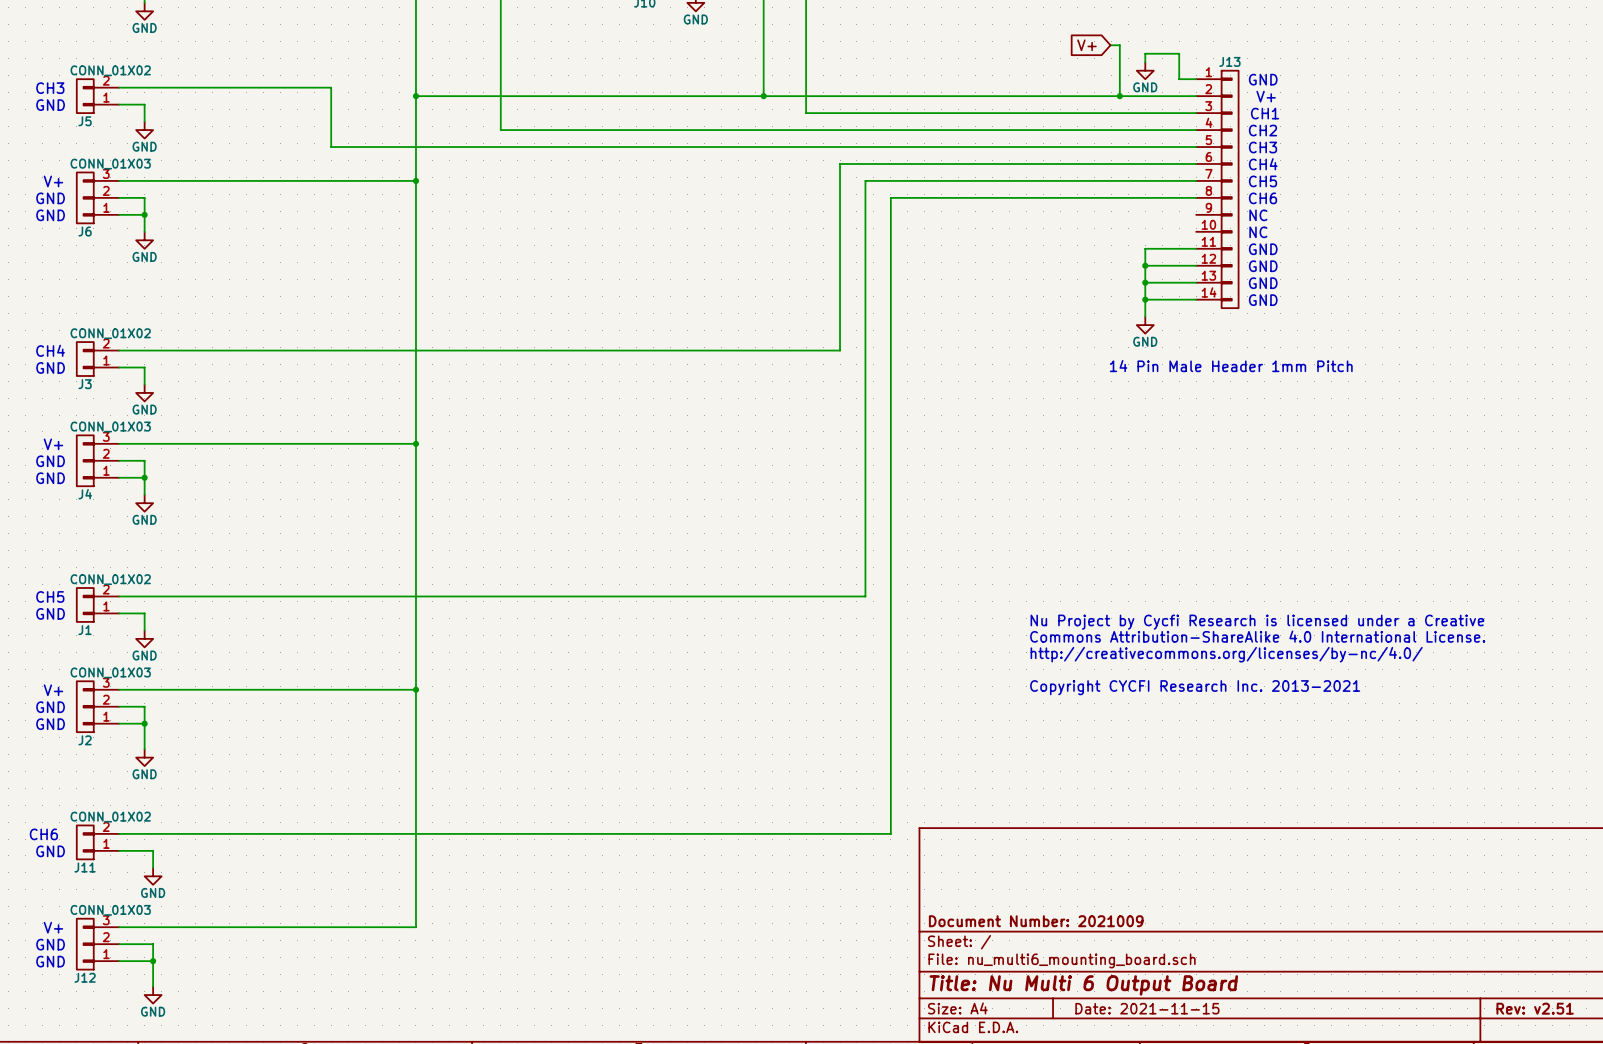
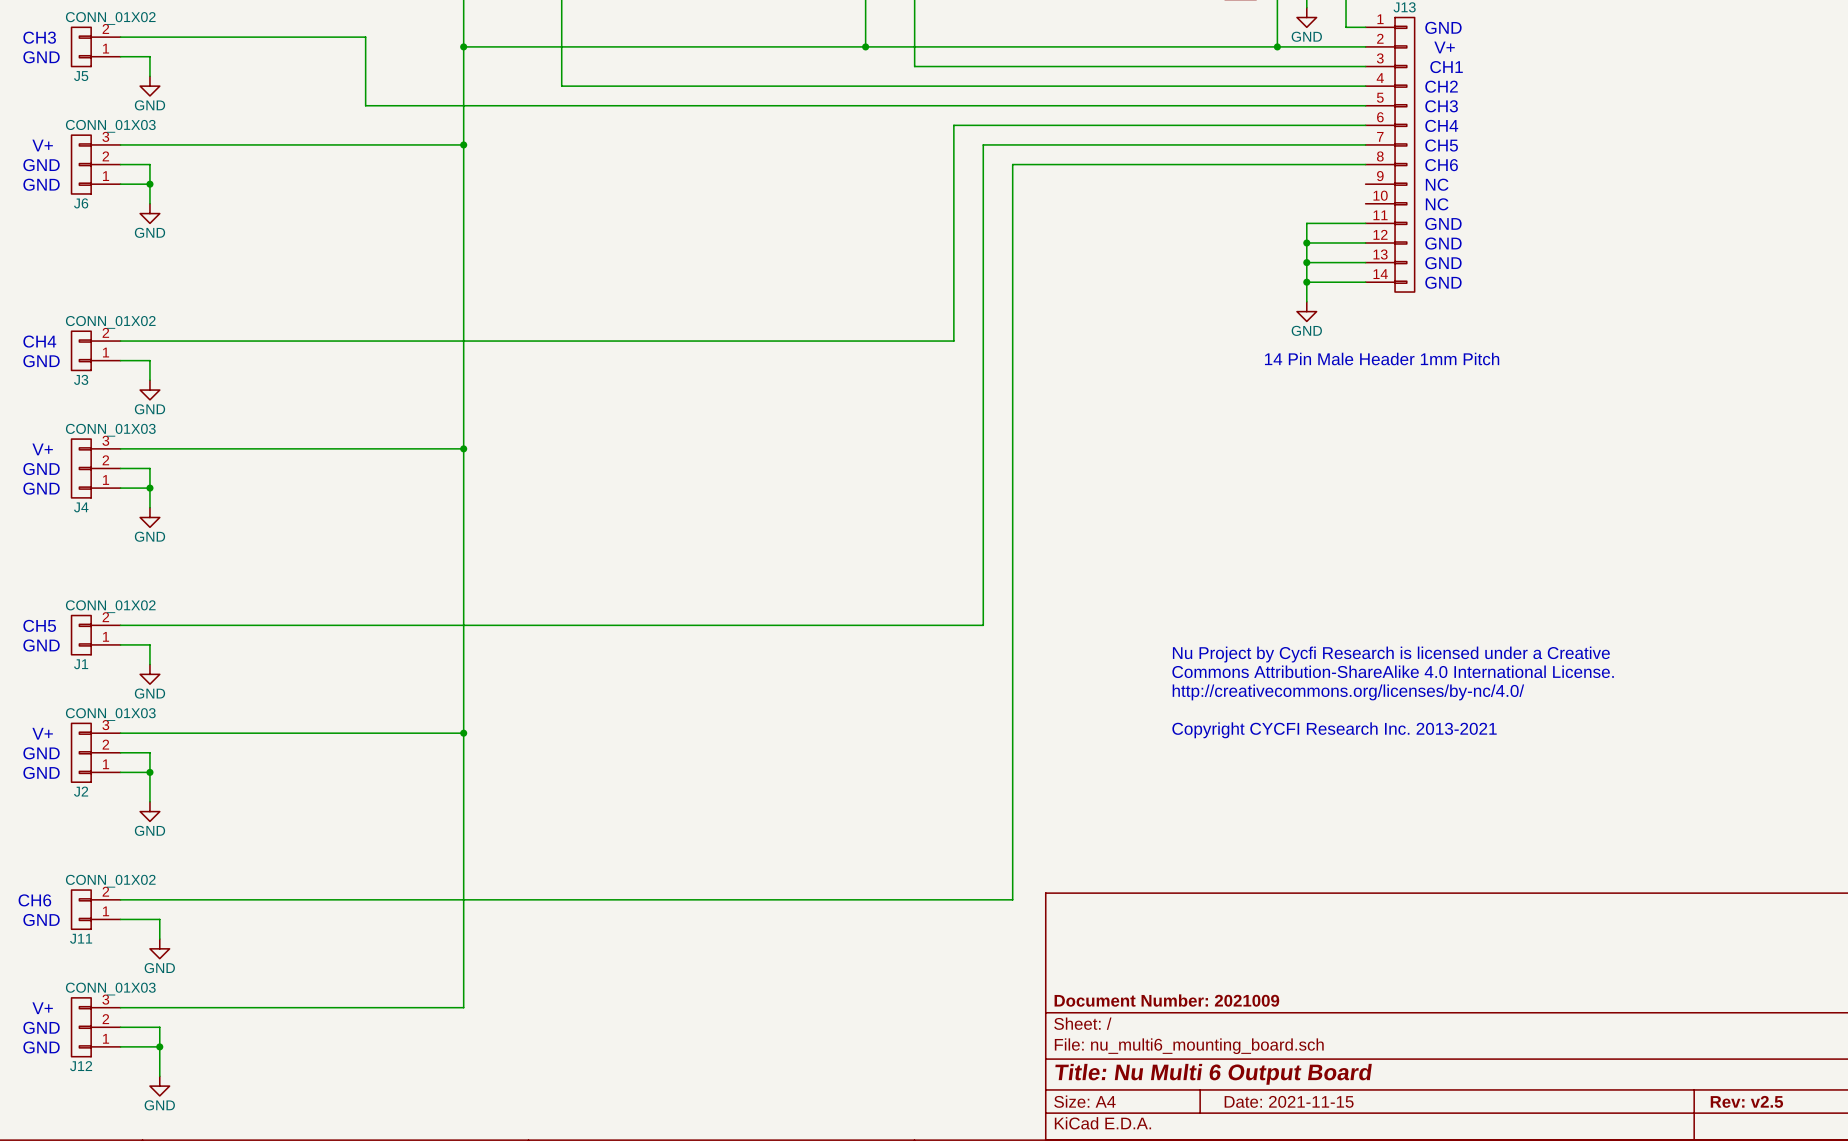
title block: Rev: v2.51 (1535, 1008) -> Rev: v2.5 (1746, 1101)

